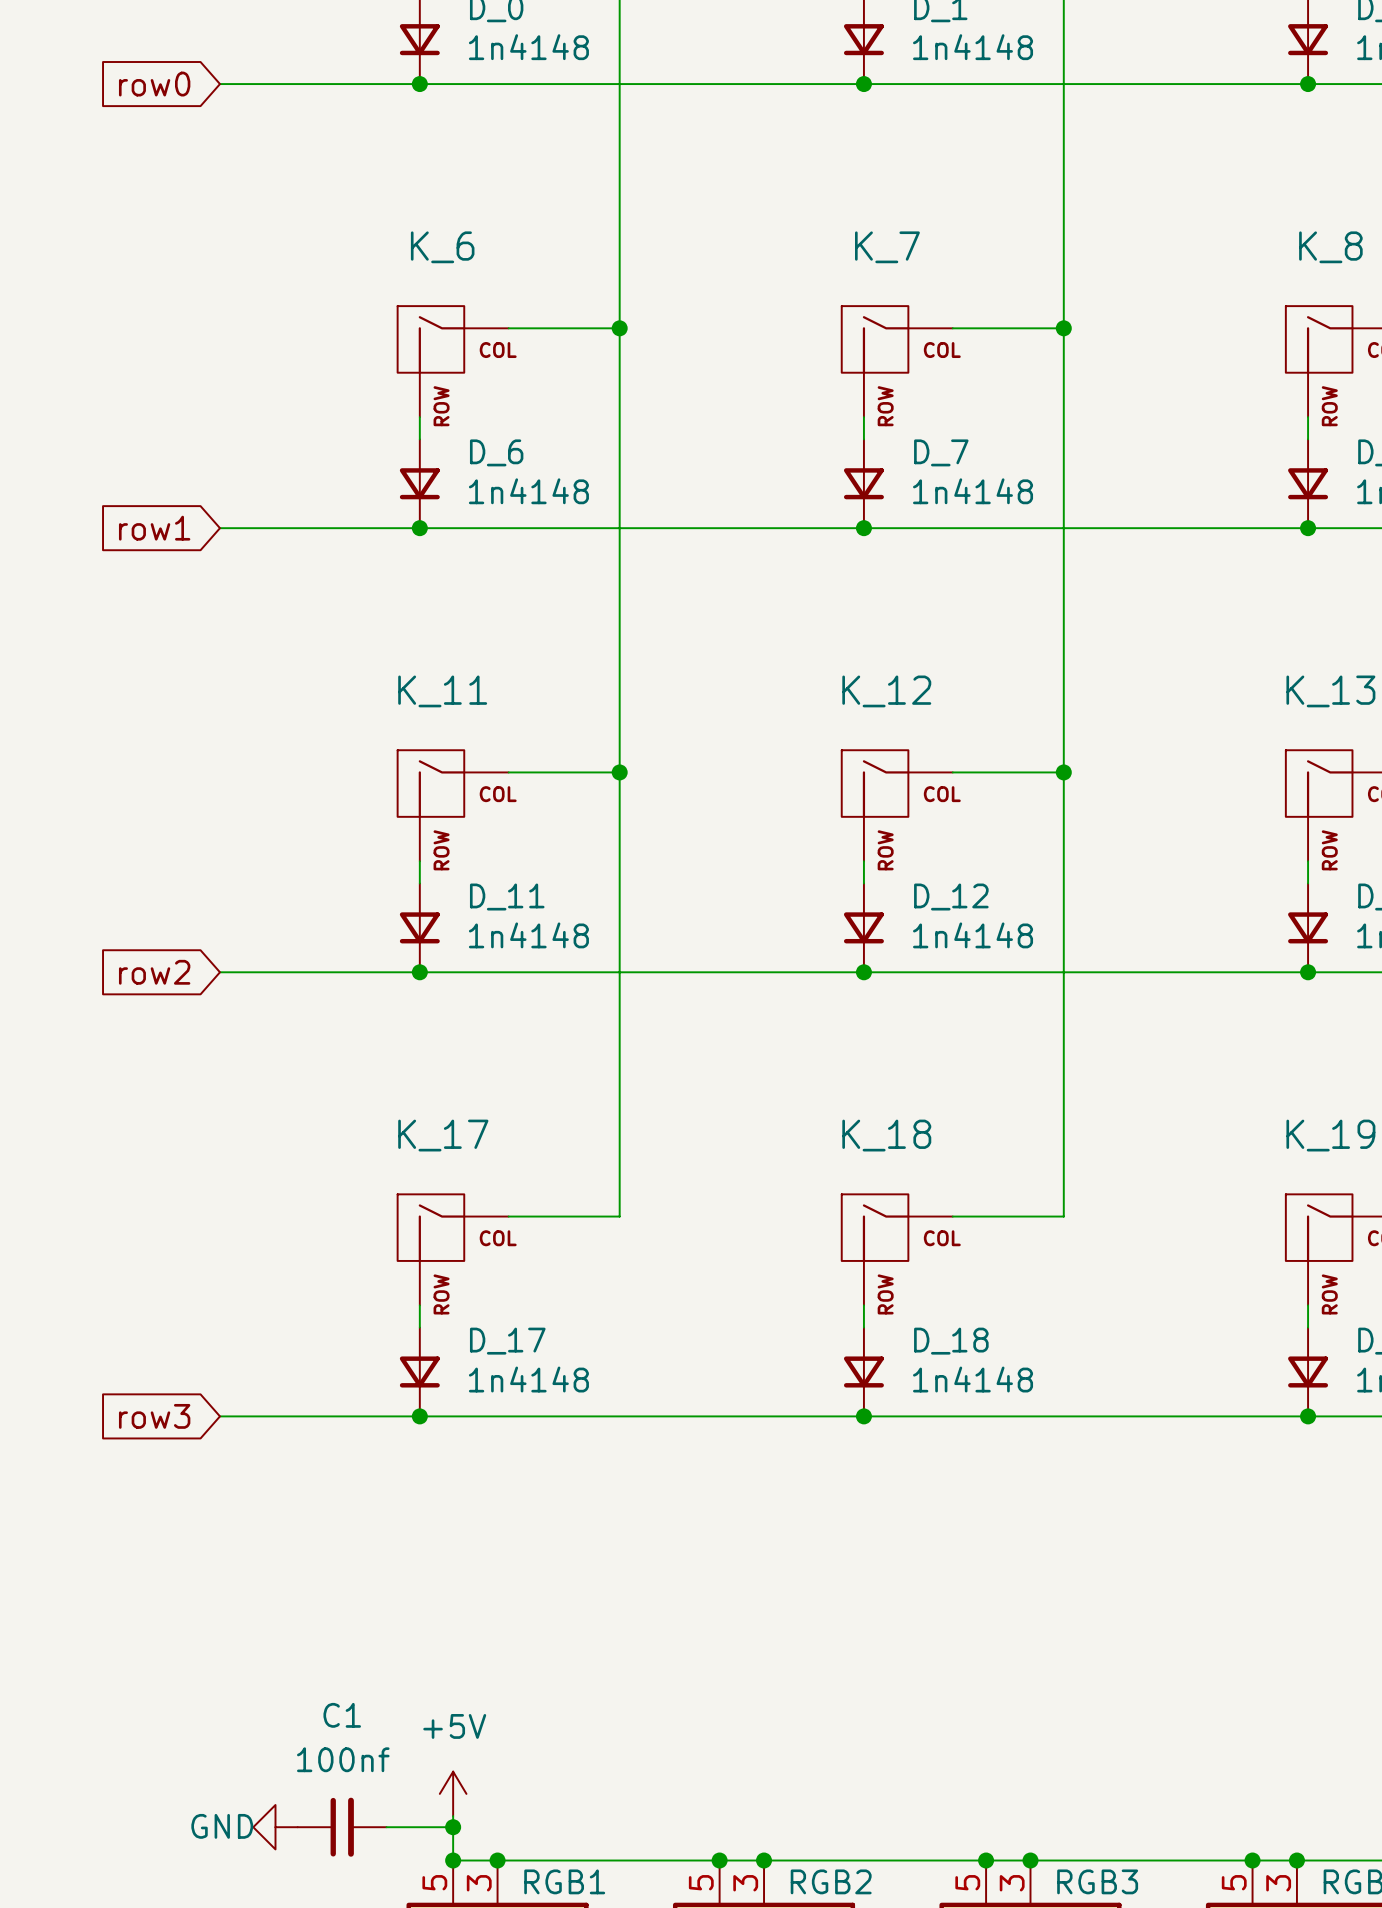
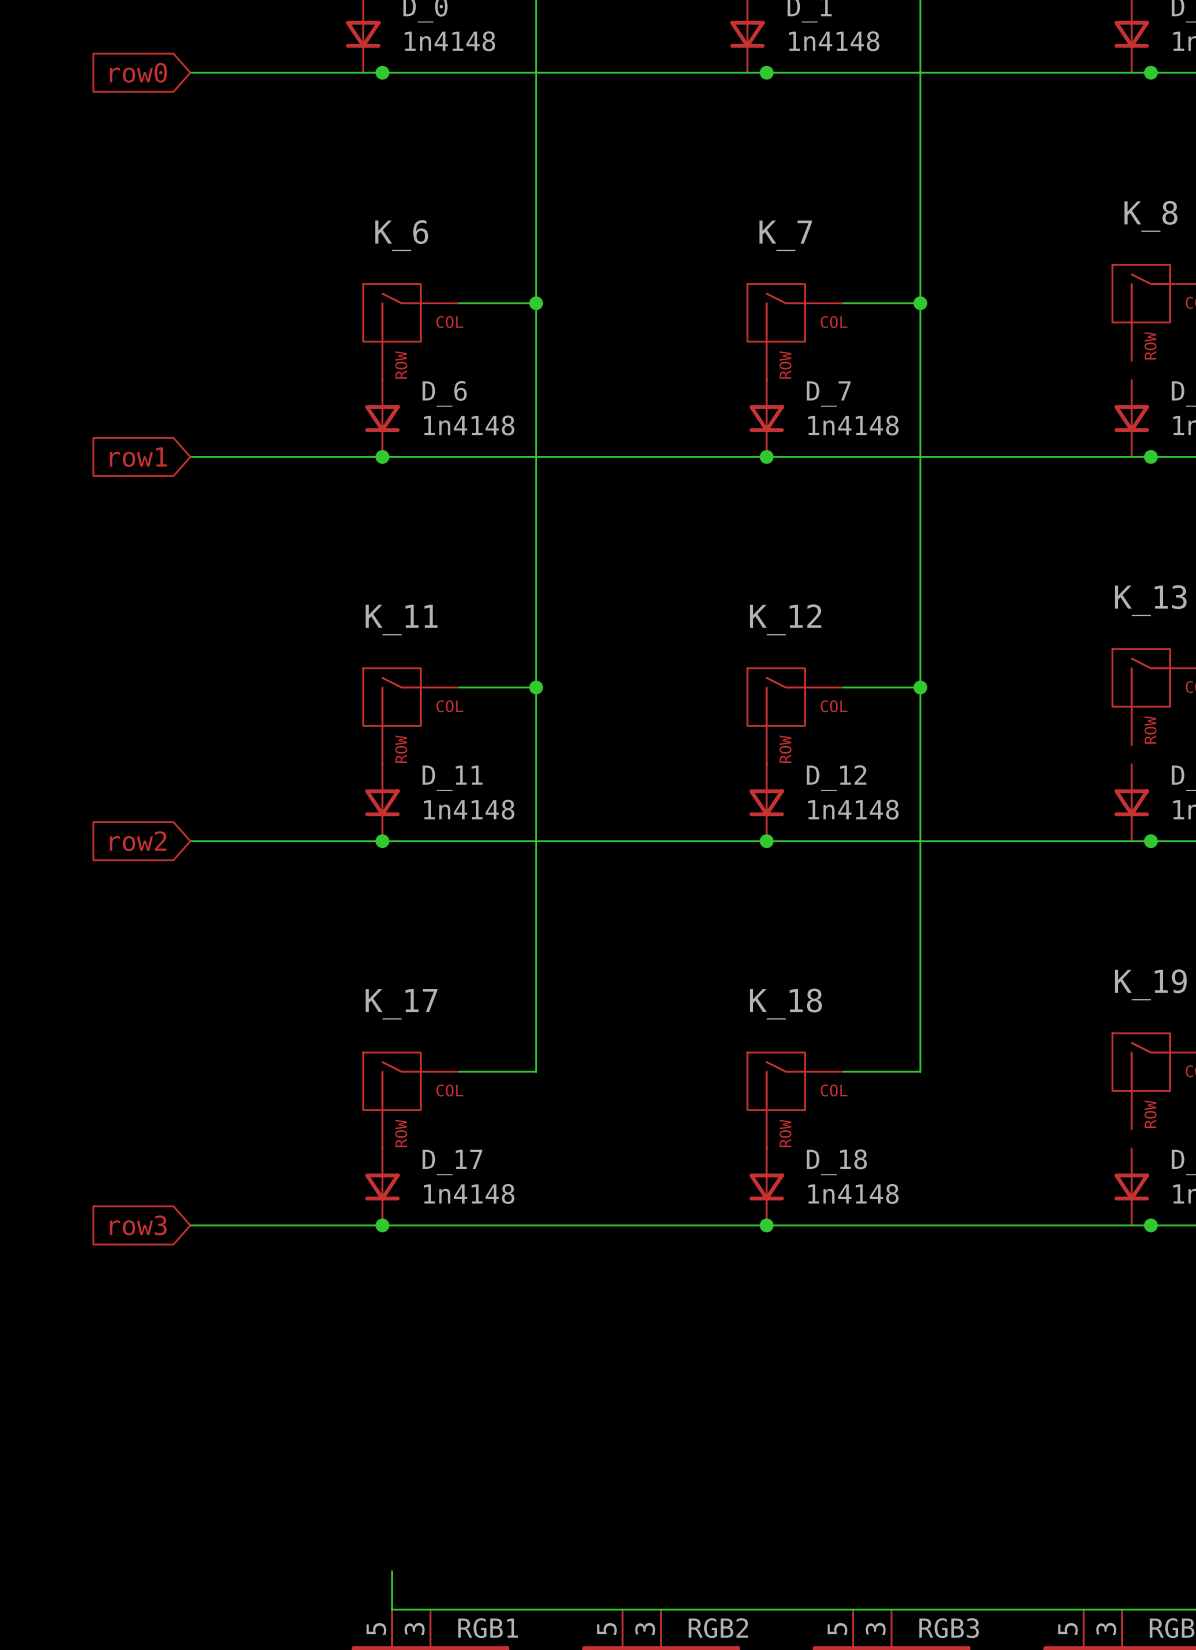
junction position: (419, 84) -> (382, 72)
junction position: (863, 84) -> (766, 72)
junction position: (1308, 84) -> (1150, 72)
wire: (508, 328) (619, 328) -> none
junction position: (619, 328) -> (536, 303)
wire: (952, 328) (1063, 328) -> none
junction position: (1063, 328) -> (920, 303)
wire: none -> (459, 303) (536, 303)
wire: none -> (843, 303) (920, 303)
K_6 position: (453, 361) -> (411, 332)
K_7 position: (897, 361) -> (795, 332)
wire: (419, 417) (419, 439) -> none
wire: (863, 417) (863, 439) -> none
wire: (1308, 417) (1308, 439) -> none
D_6 position: (419, 483) -> (382, 418)
D_7 position: (863, 483) -> (766, 418)
junction position: (419, 528) -> (382, 456)
junction position: (863, 528) -> (766, 456)
junction position: (1308, 528) -> (1150, 456)
wire: (508, 772) (619, 772) -> none
junction position: (619, 772) -> (536, 687)
wire: (952, 772) (1063, 772) -> none
junction position: (1063, 772) -> (920, 687)
wire: none -> (459, 687) (536, 687)
wire: none -> (843, 687) (920, 687)
K_11 position: (453, 805) -> (411, 716)
K_12 position: (897, 805) -> (795, 716)
wire: (419, 861) (419, 883) -> none
wire: (863, 861) (863, 883) -> none
wire: (1308, 861) (1308, 883) -> none
D_11 position: (419, 927) -> (382, 802)
D_12 position: (863, 927) -> (766, 802)
junction position: (419, 972) -> (382, 841)
junction position: (863, 972) -> (766, 841)
junction position: (1308, 972) -> (1150, 841)
wire: (508, 1216) (619, 1216) -> (459, 1071) (536, 1071) (536, 1052)
wire: (952, 1216) (1063, 1216) -> (843, 1071) (920, 1071) (920, 1052)
K_17 position: (453, 1249) -> (411, 1100)
K_18 position: (897, 1249) -> (795, 1100)
wire: (419, 1305) (419, 1327) -> none
wire: (863, 1305) (863, 1327) -> none
wire: (1308, 1305) (1308, 1327) -> none
D_17 position: (419, 1371) -> (382, 1186)
D_18 position: (863, 1371) -> (766, 1186)
junction position: (419, 1416) -> (382, 1225)
junction position: (863, 1416) -> (766, 1225)
junction position: (1308, 1416) -> (1150, 1225)
power symbol: +5V (453, 1793) -> none
power symbol: GND (275, 1827) -> none
C1: 100nf (342, 1827) -> none
wire: (386, 1827) (453, 1827) -> none
junction: (453, 1827) -> none
junction: (453, 1860) -> none
junction: (497, 1860) -> none
junction: (719, 1860) -> none
junction: (764, 1860) -> none
junction: (986, 1860) -> none
junction: (1030, 1860) -> none
junction: (1252, 1860) -> none
junction: (1296, 1860) -> none

